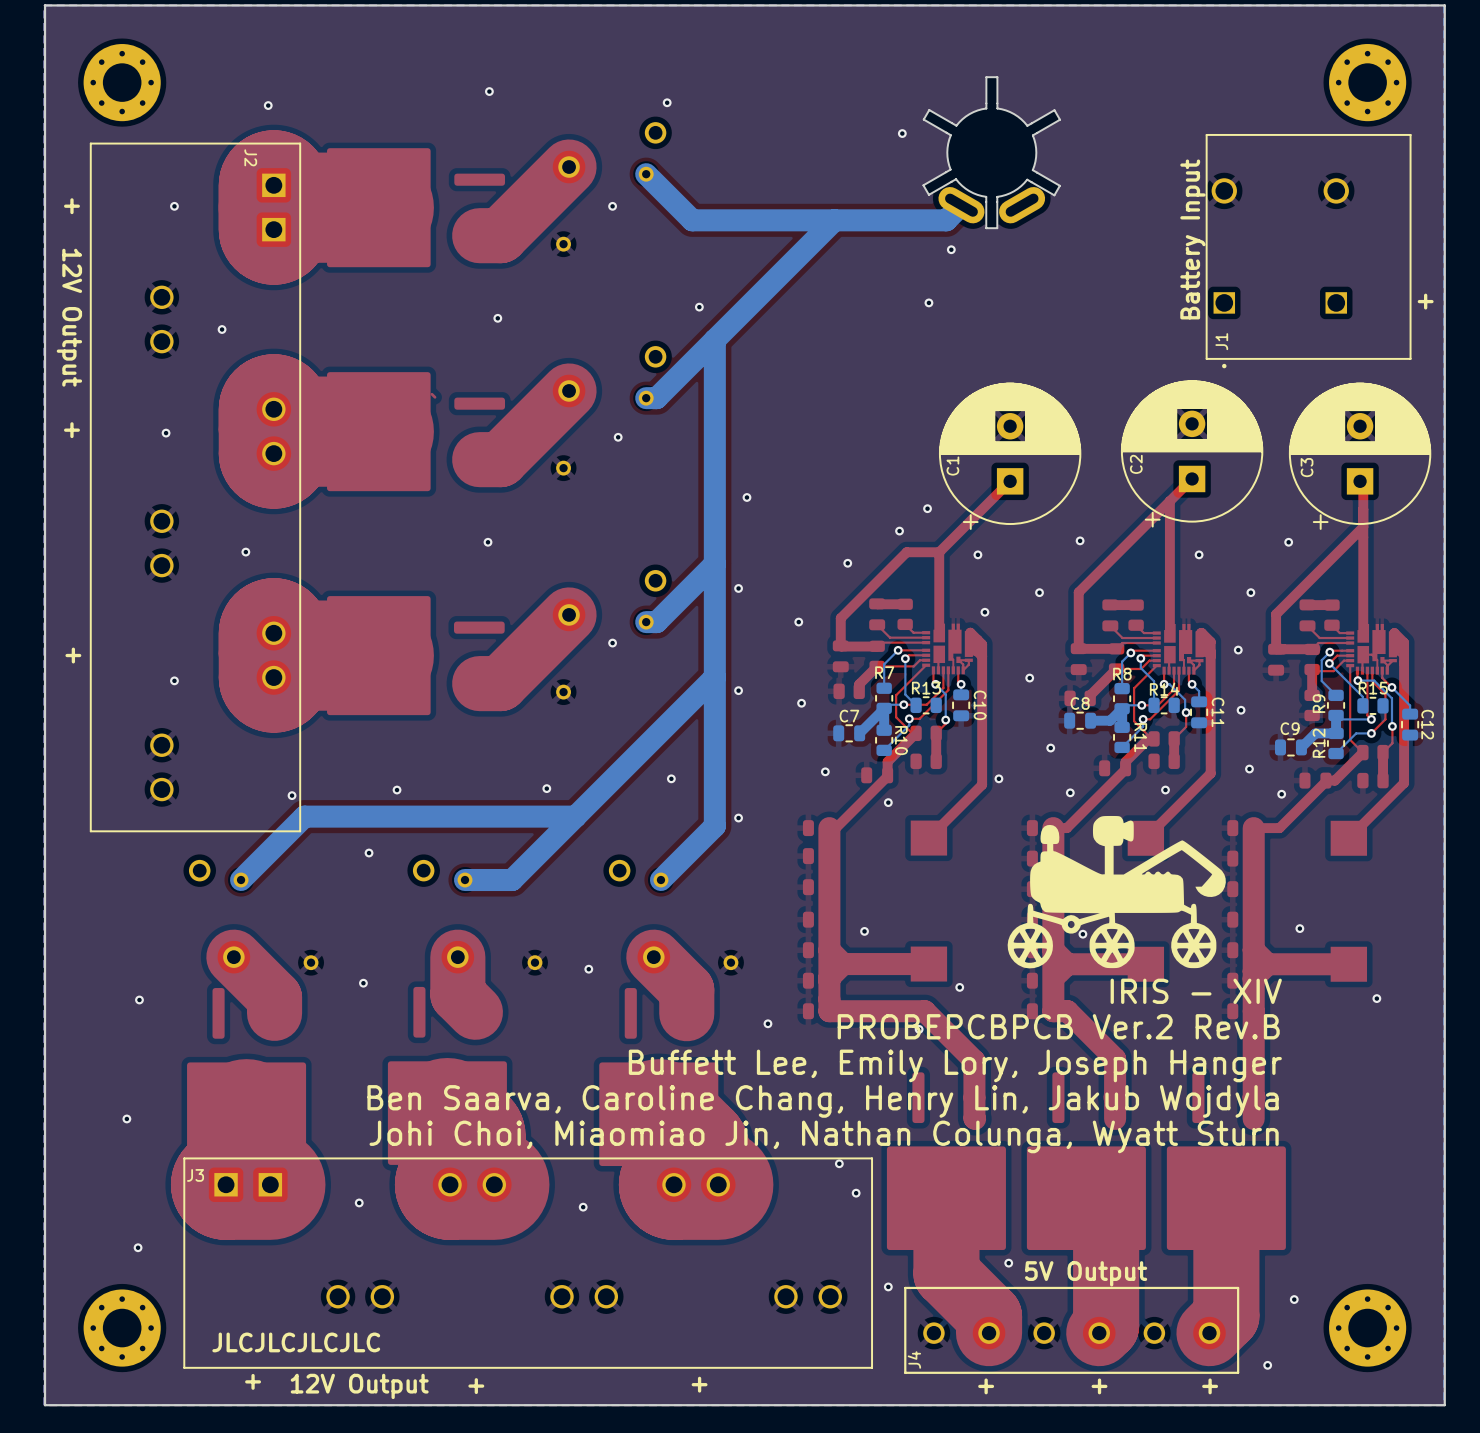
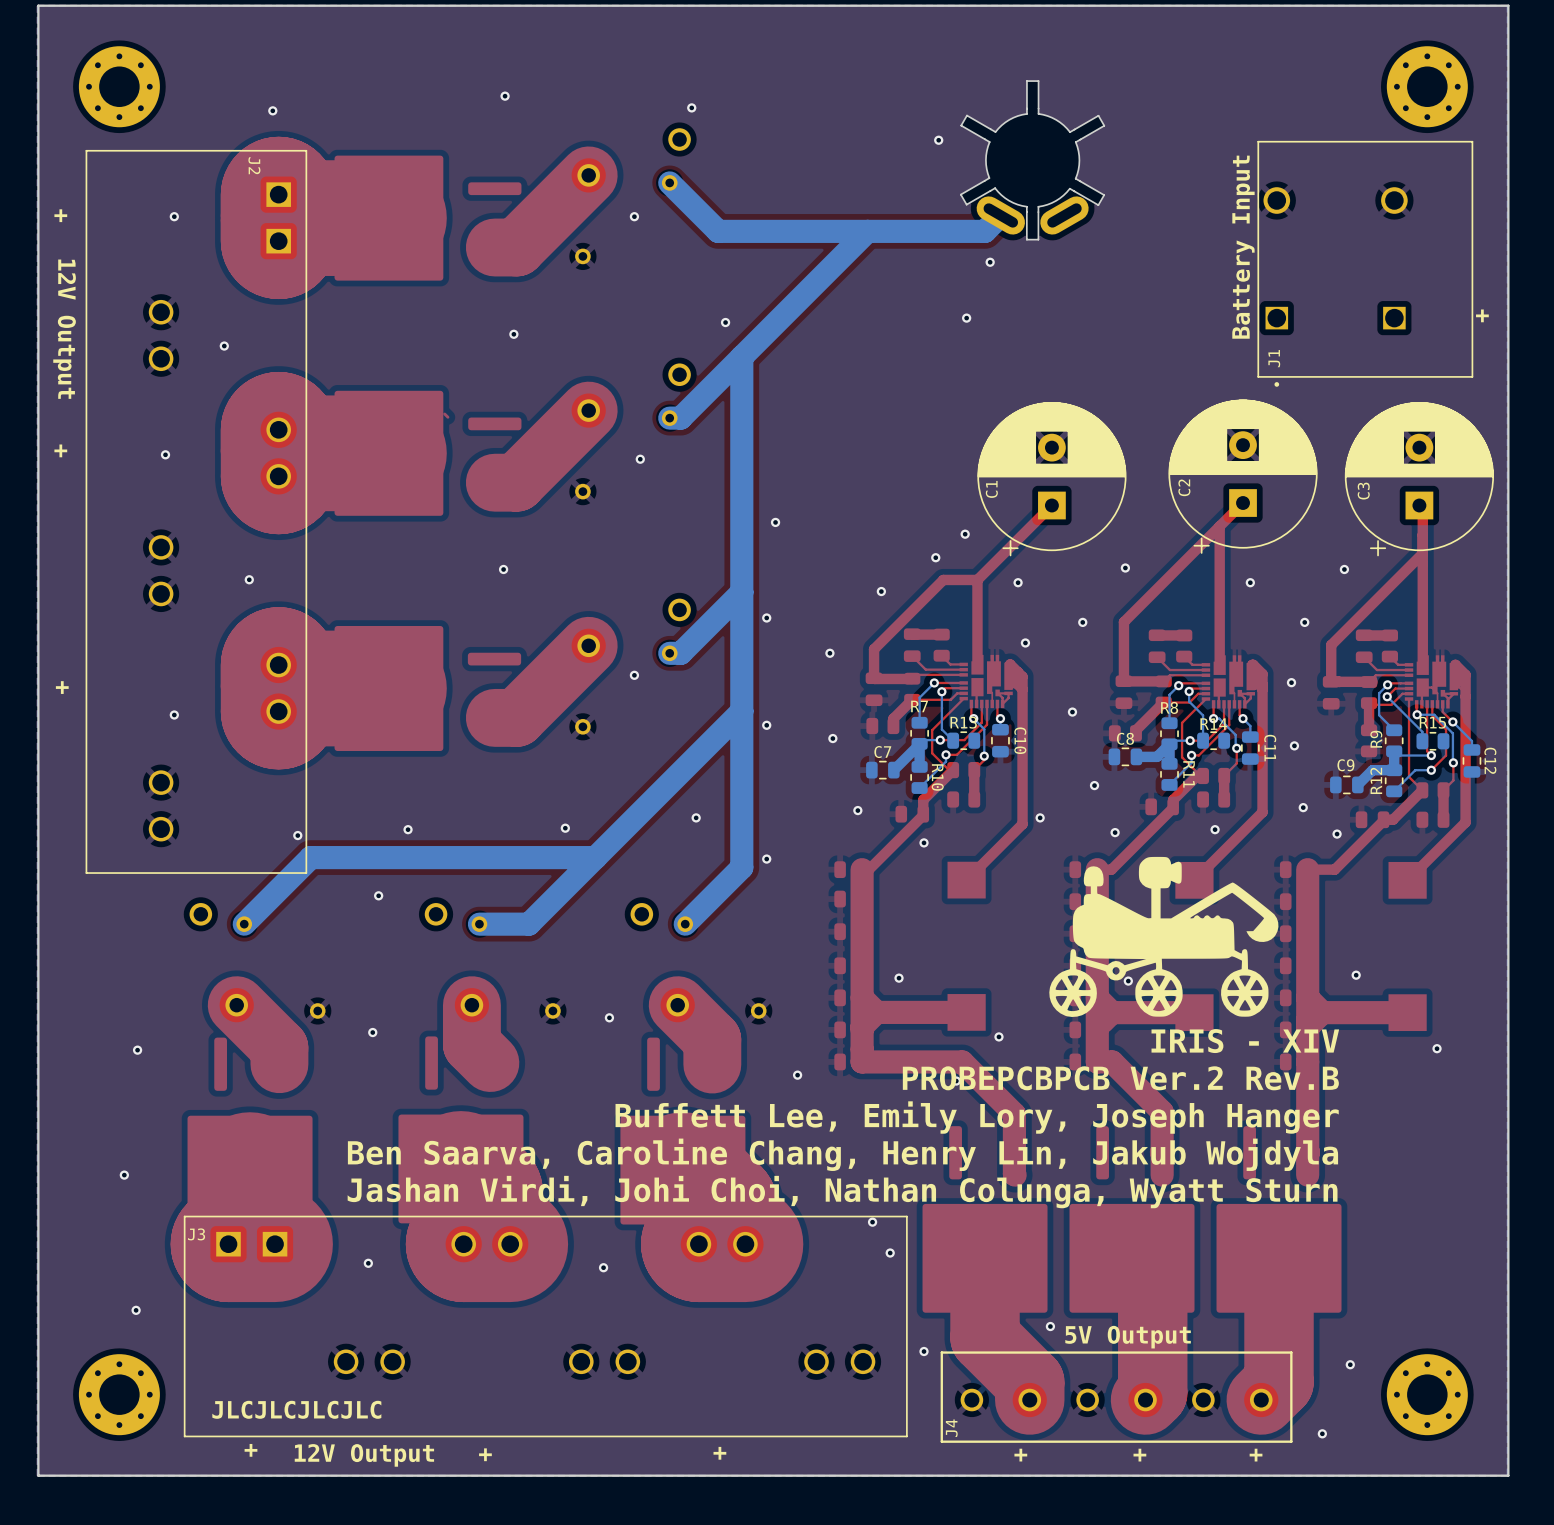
text: Johi Choi, Miaomiao Jin, Nathan Colunga, Wyatt Sturn (824, 1136) -> Jashan Virdi, Johi Choi, Nathan Colunga, Wyatt Sturn (842, 1192)

